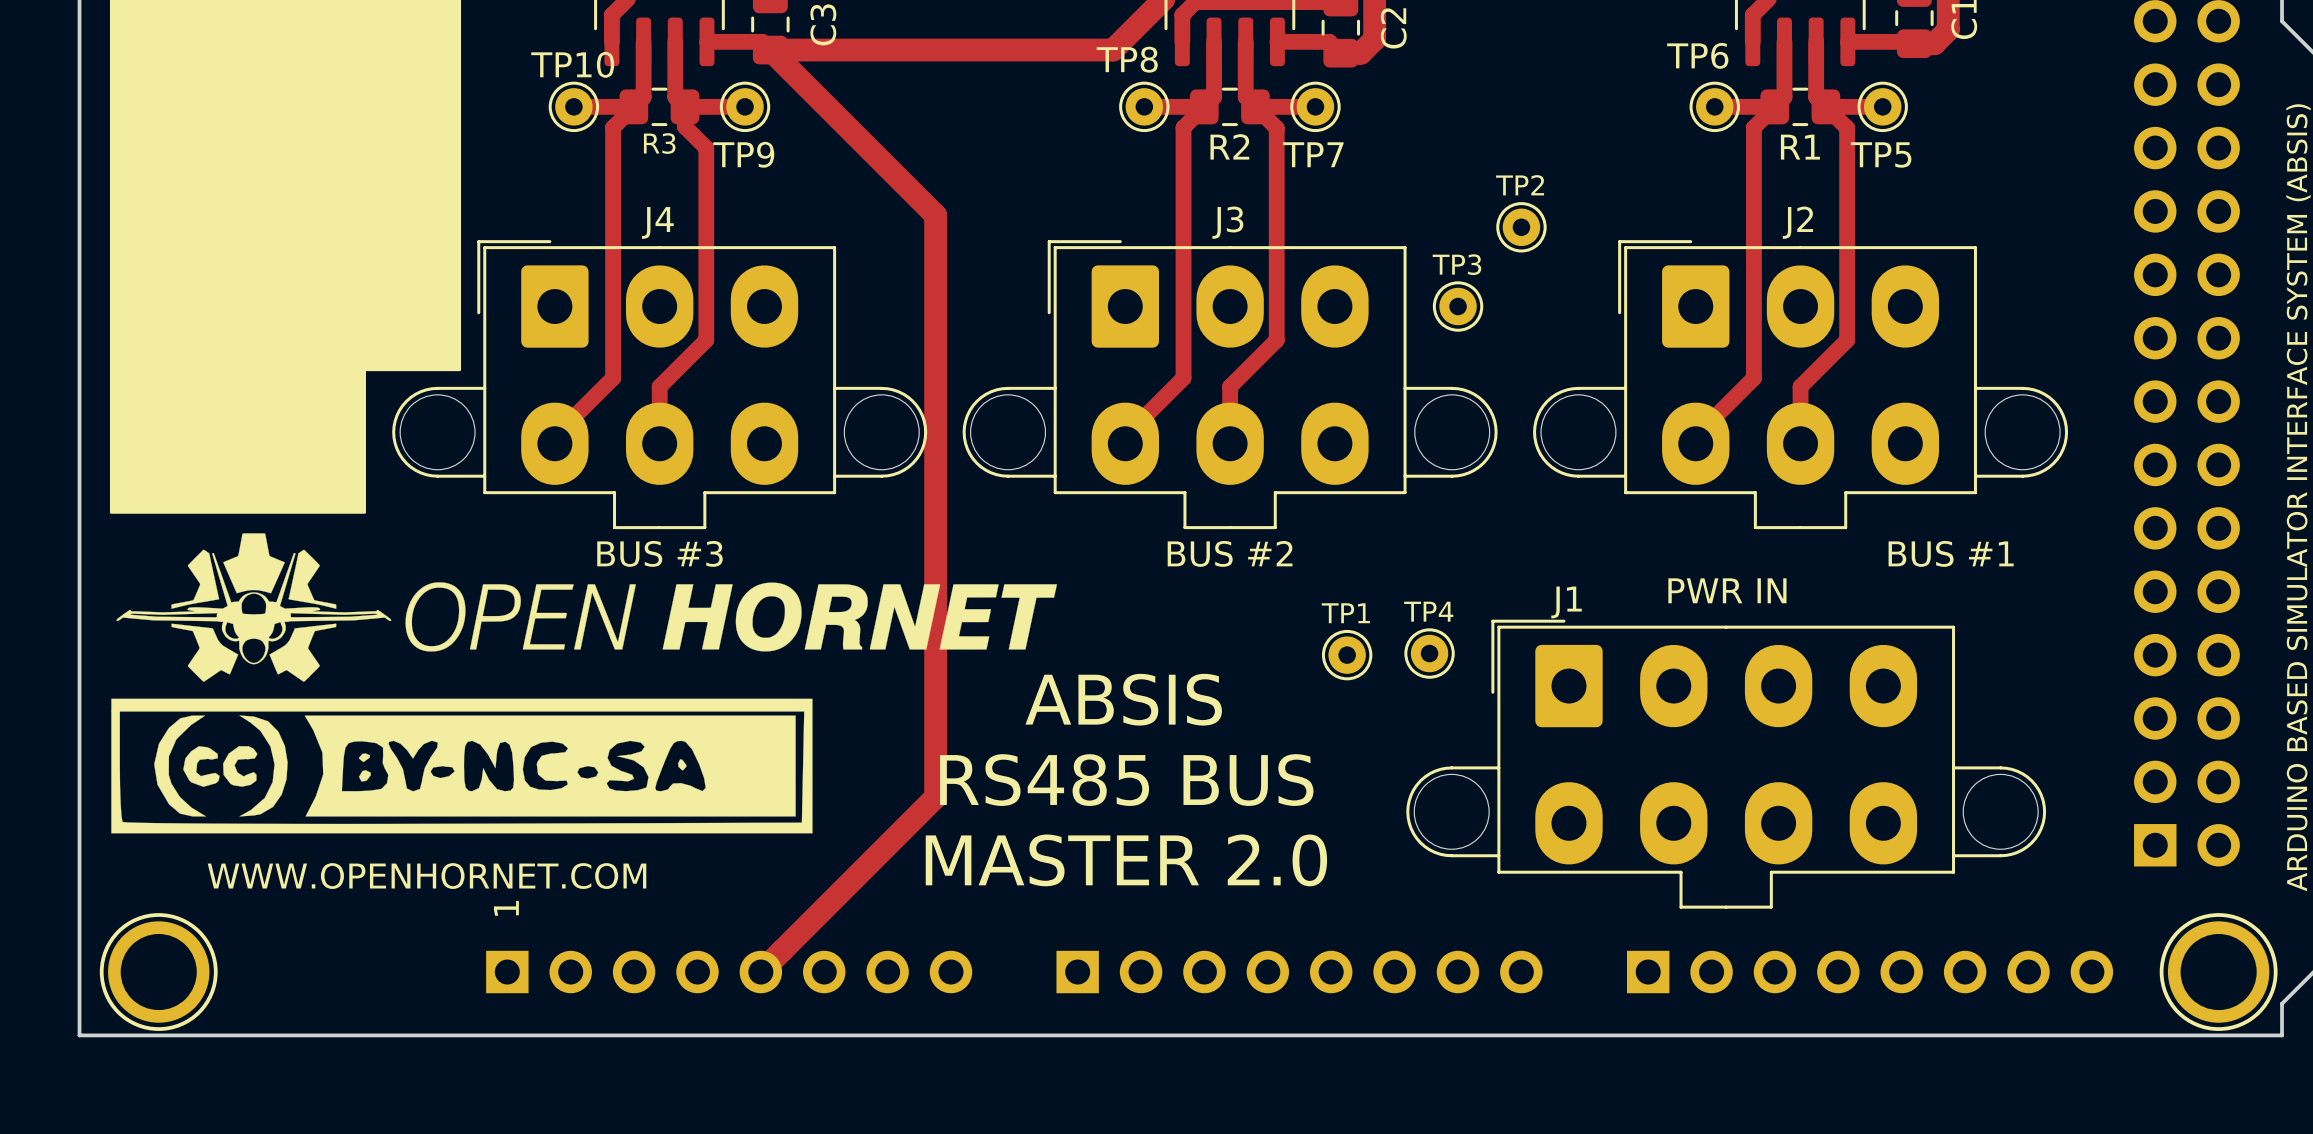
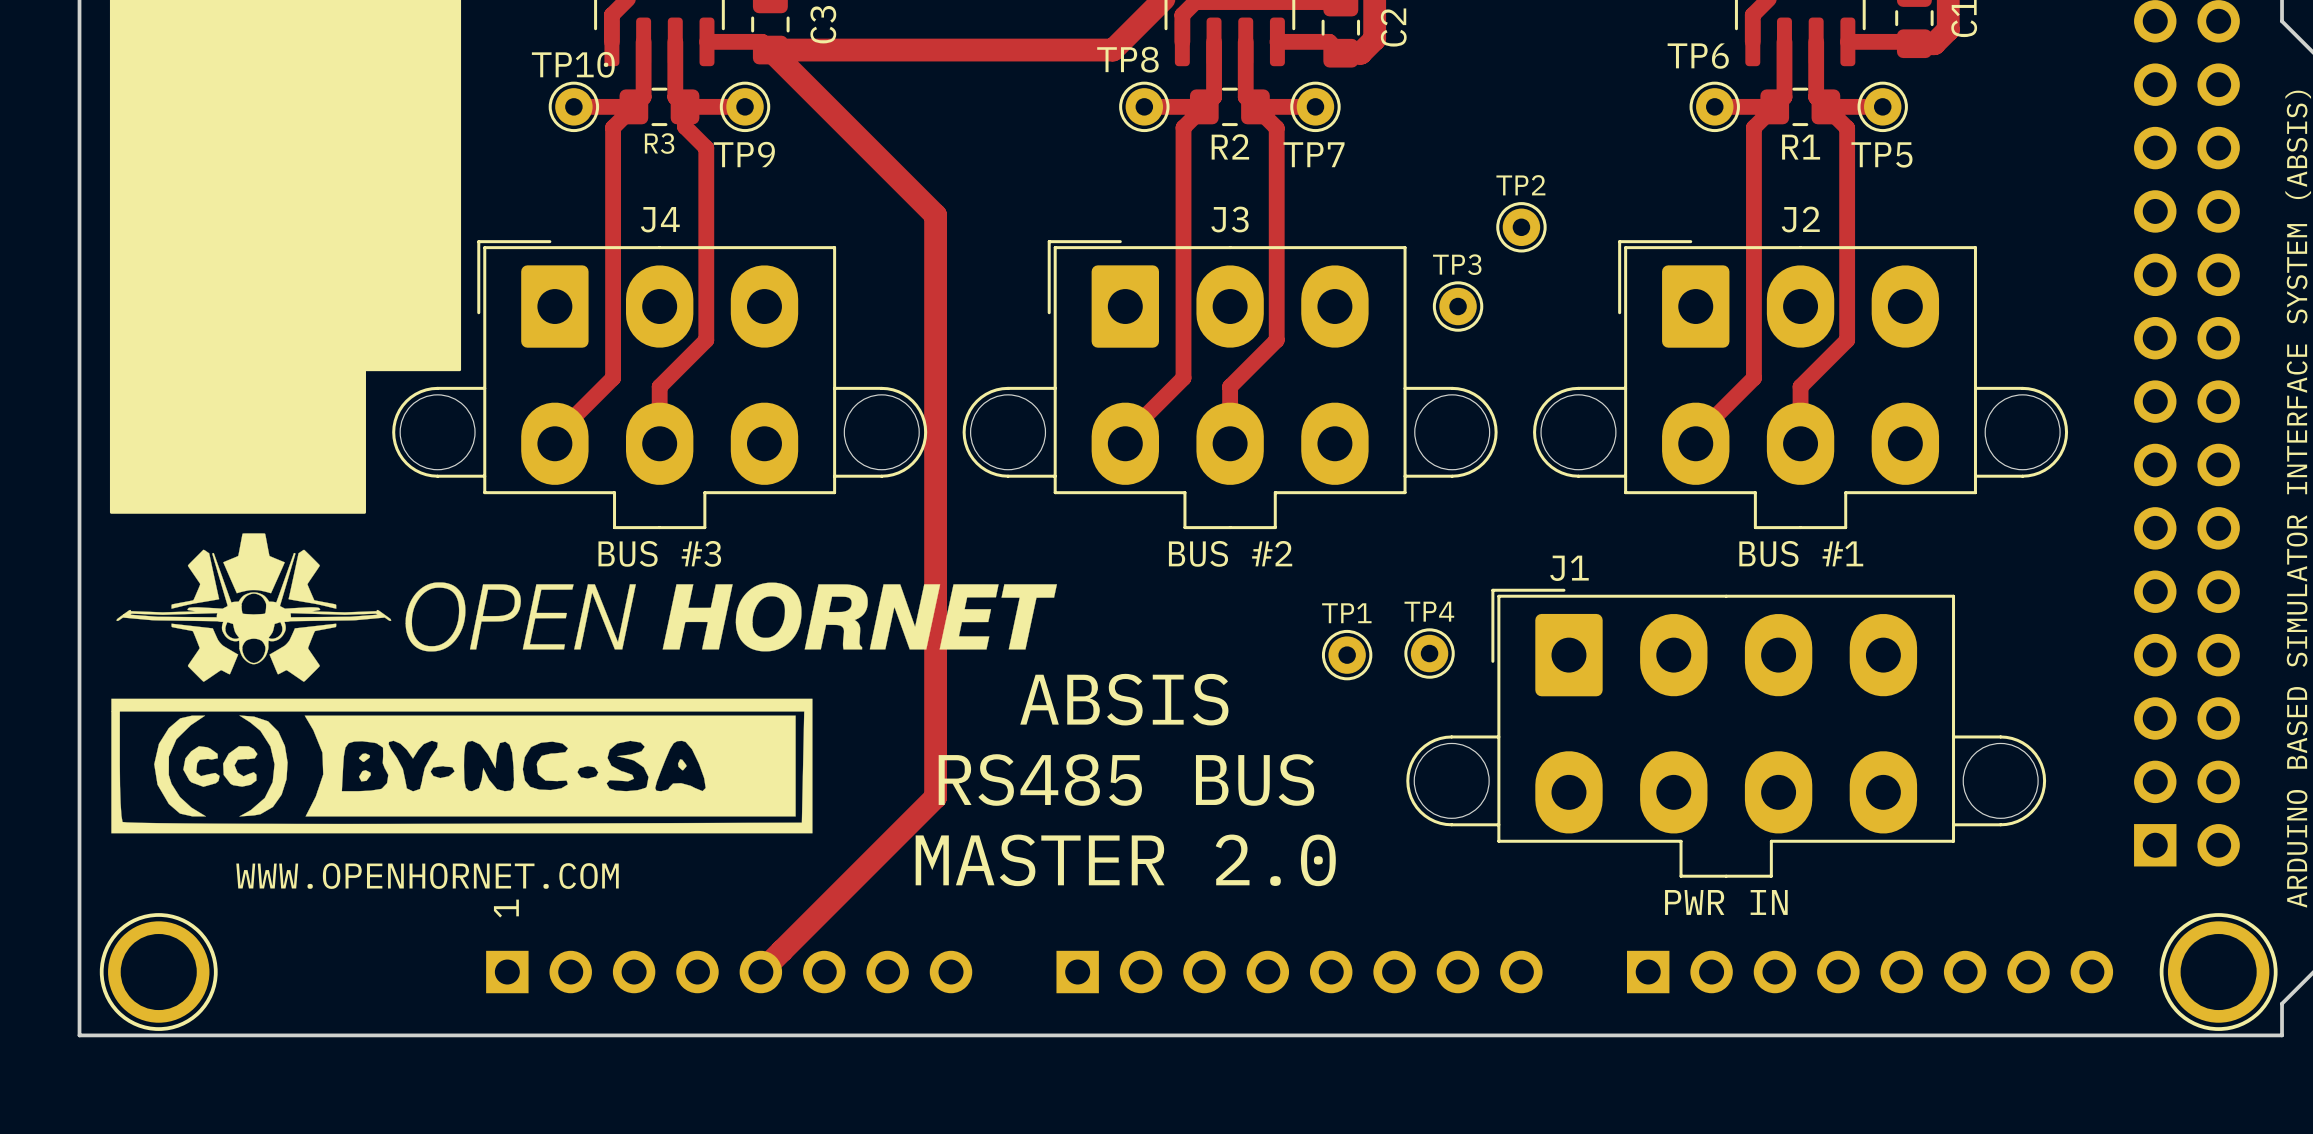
J2 value position: BUS #1 (1951, 553) -> BUS #1 (1801, 553)
J1 value position: PWR IN (1727, 590) -> PWR IN (1726, 902)
J1 position: (1726, 764) -> (1726, 733)

